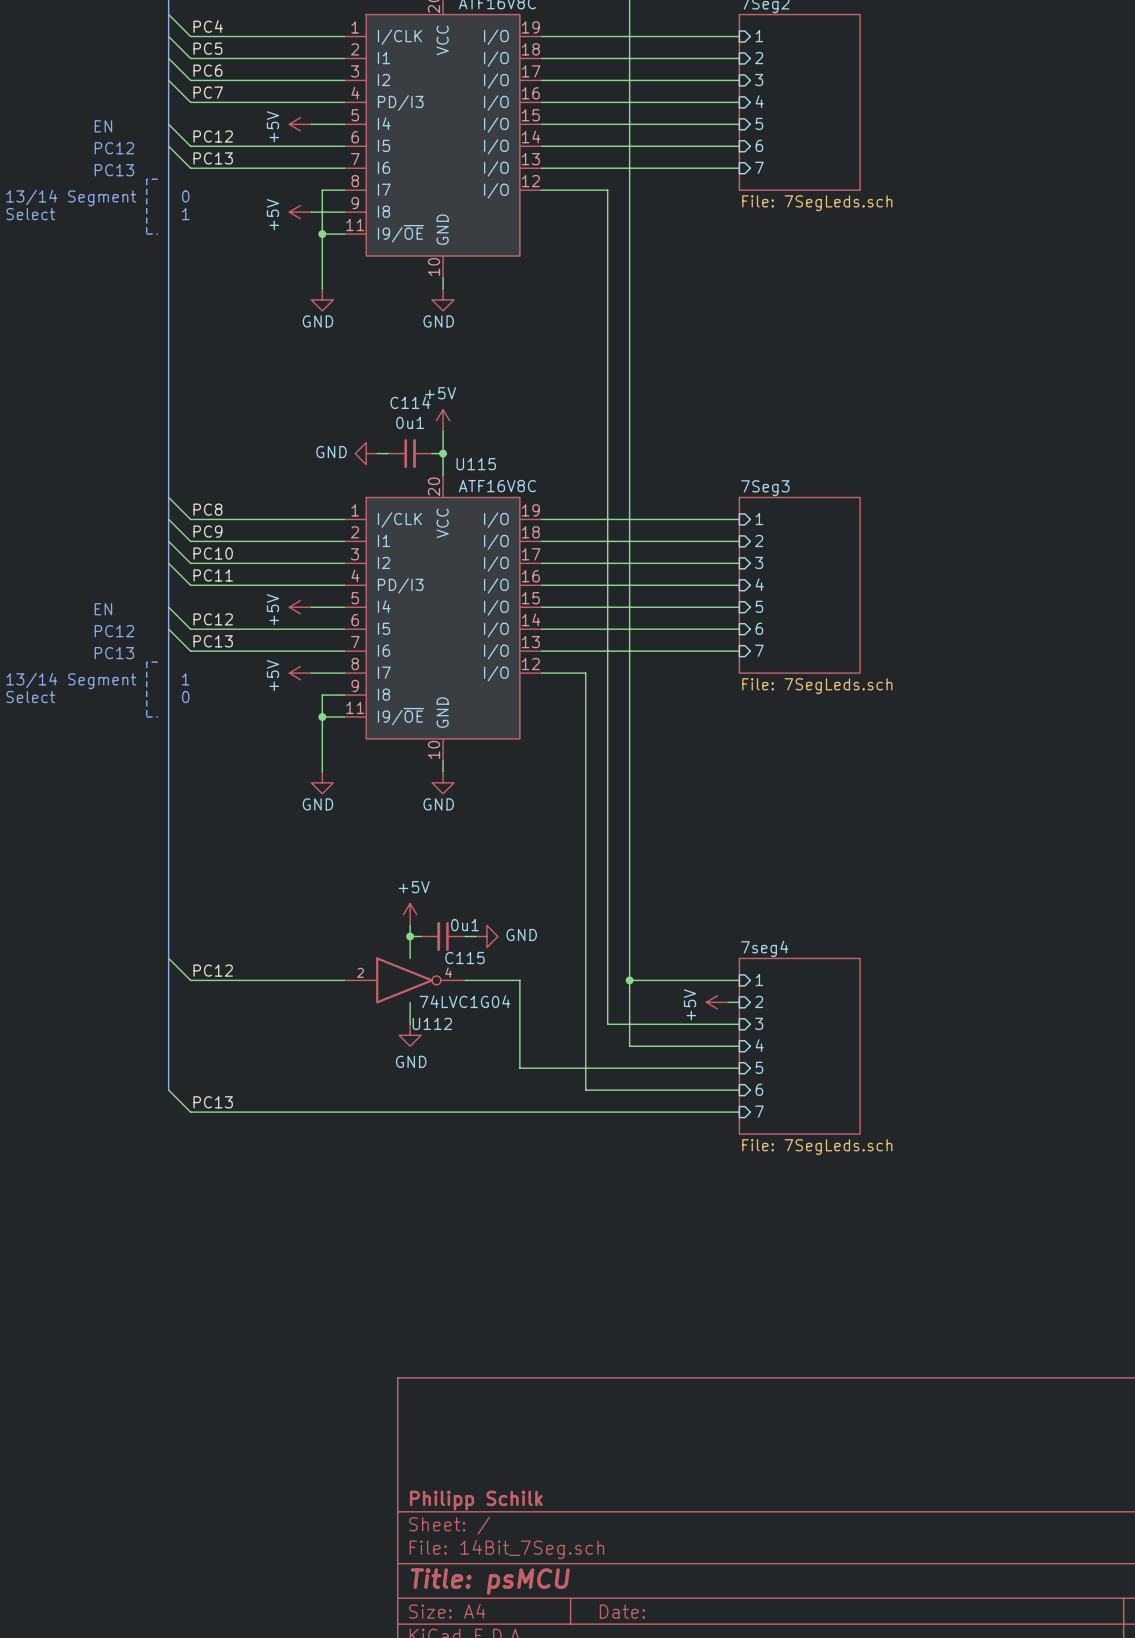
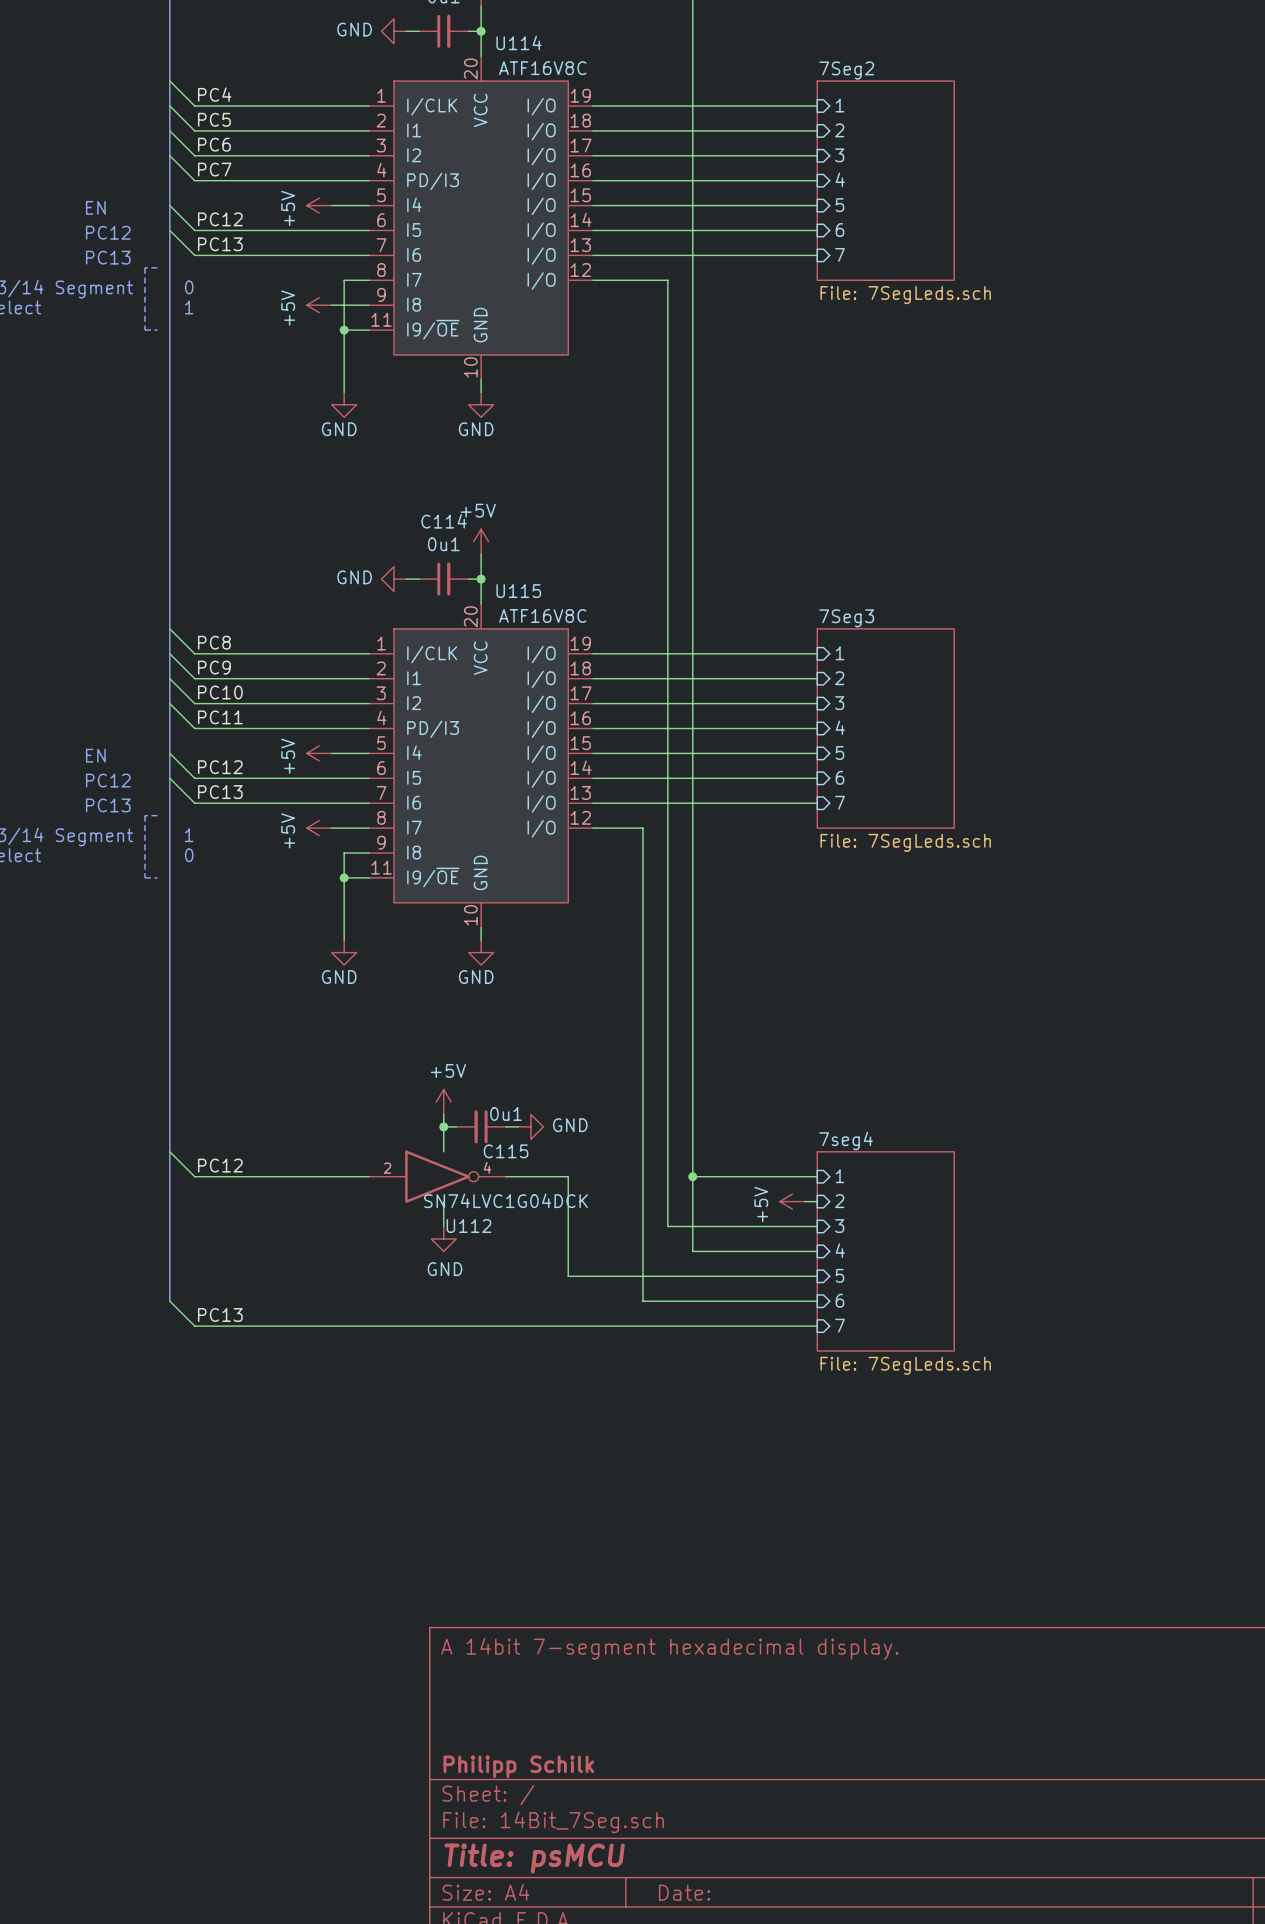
U112 value: 74LVC1G04 (465, 1001) -> SN74LVC1G04DCK (506, 1200)
title block: none -> A 14bit 7-segment hexadecimal display. (669, 1648)

